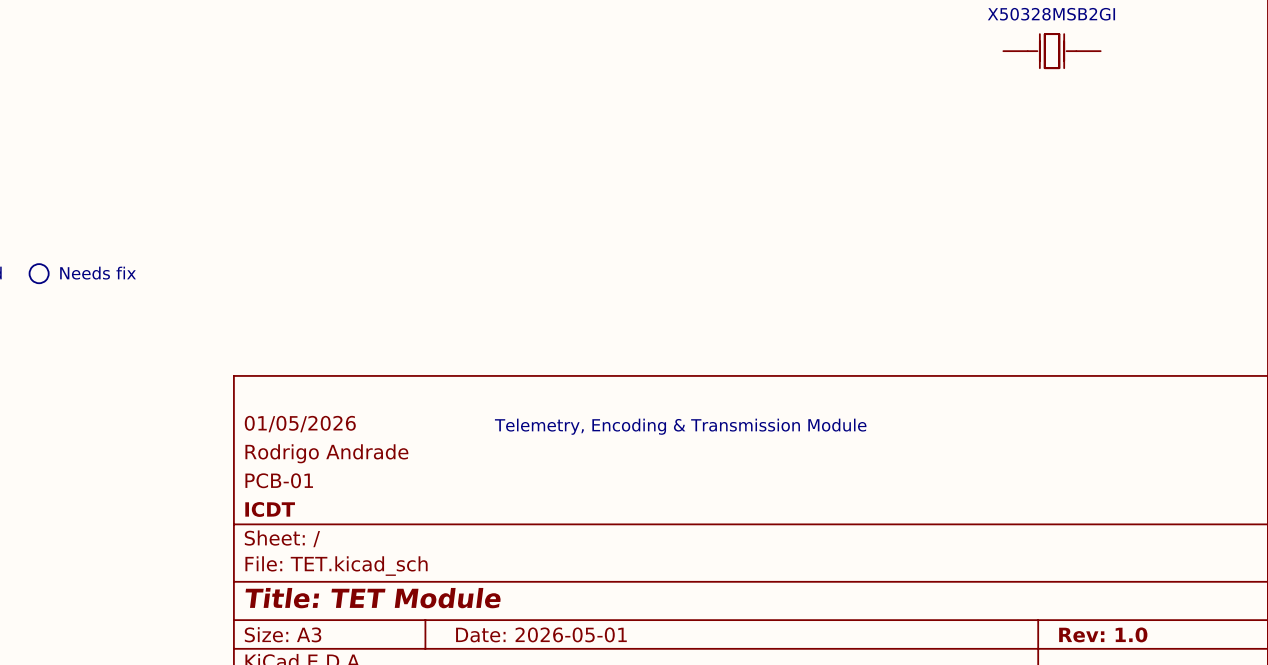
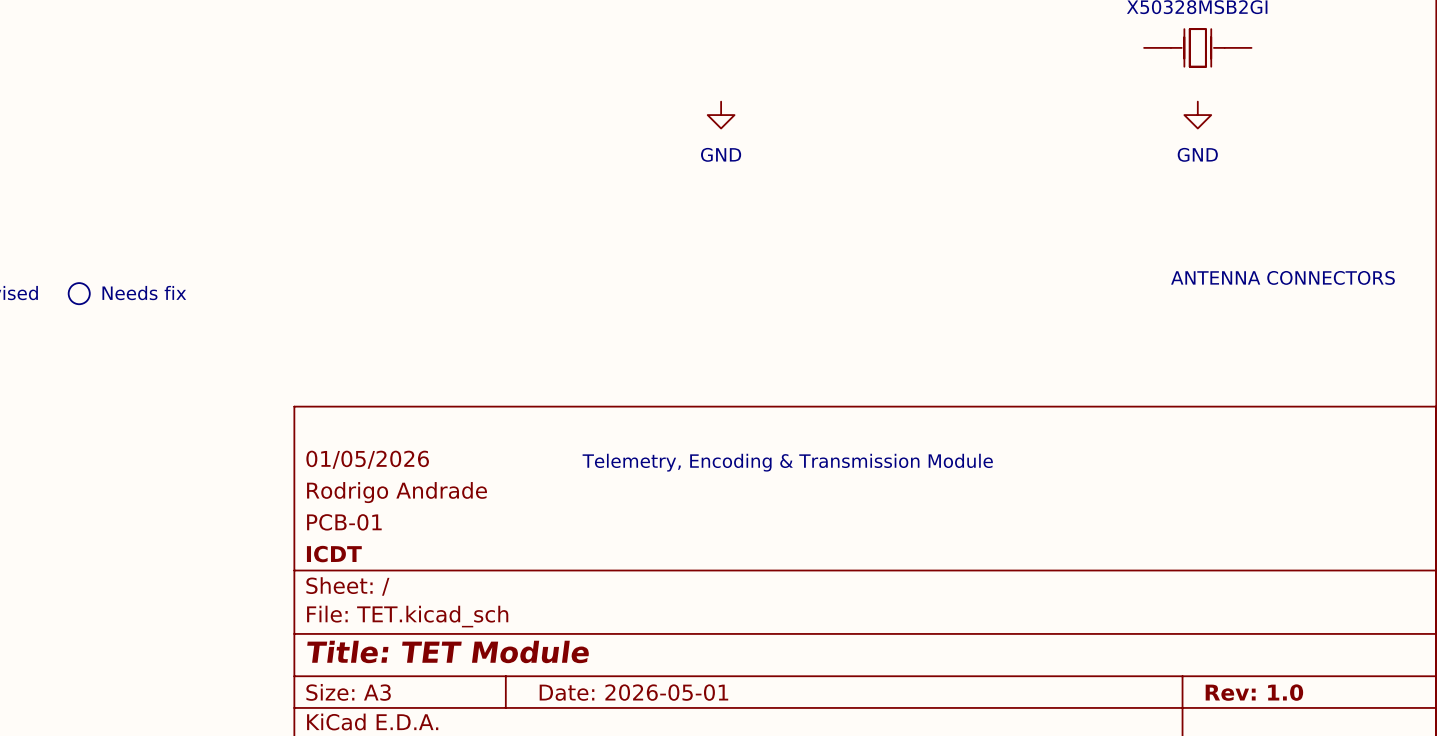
power symbol: none -> GND (721, 115)
power symbol: none -> GND (1197, 115)
text: none -> ANTENNA CONNECTORS (1282, 277)

